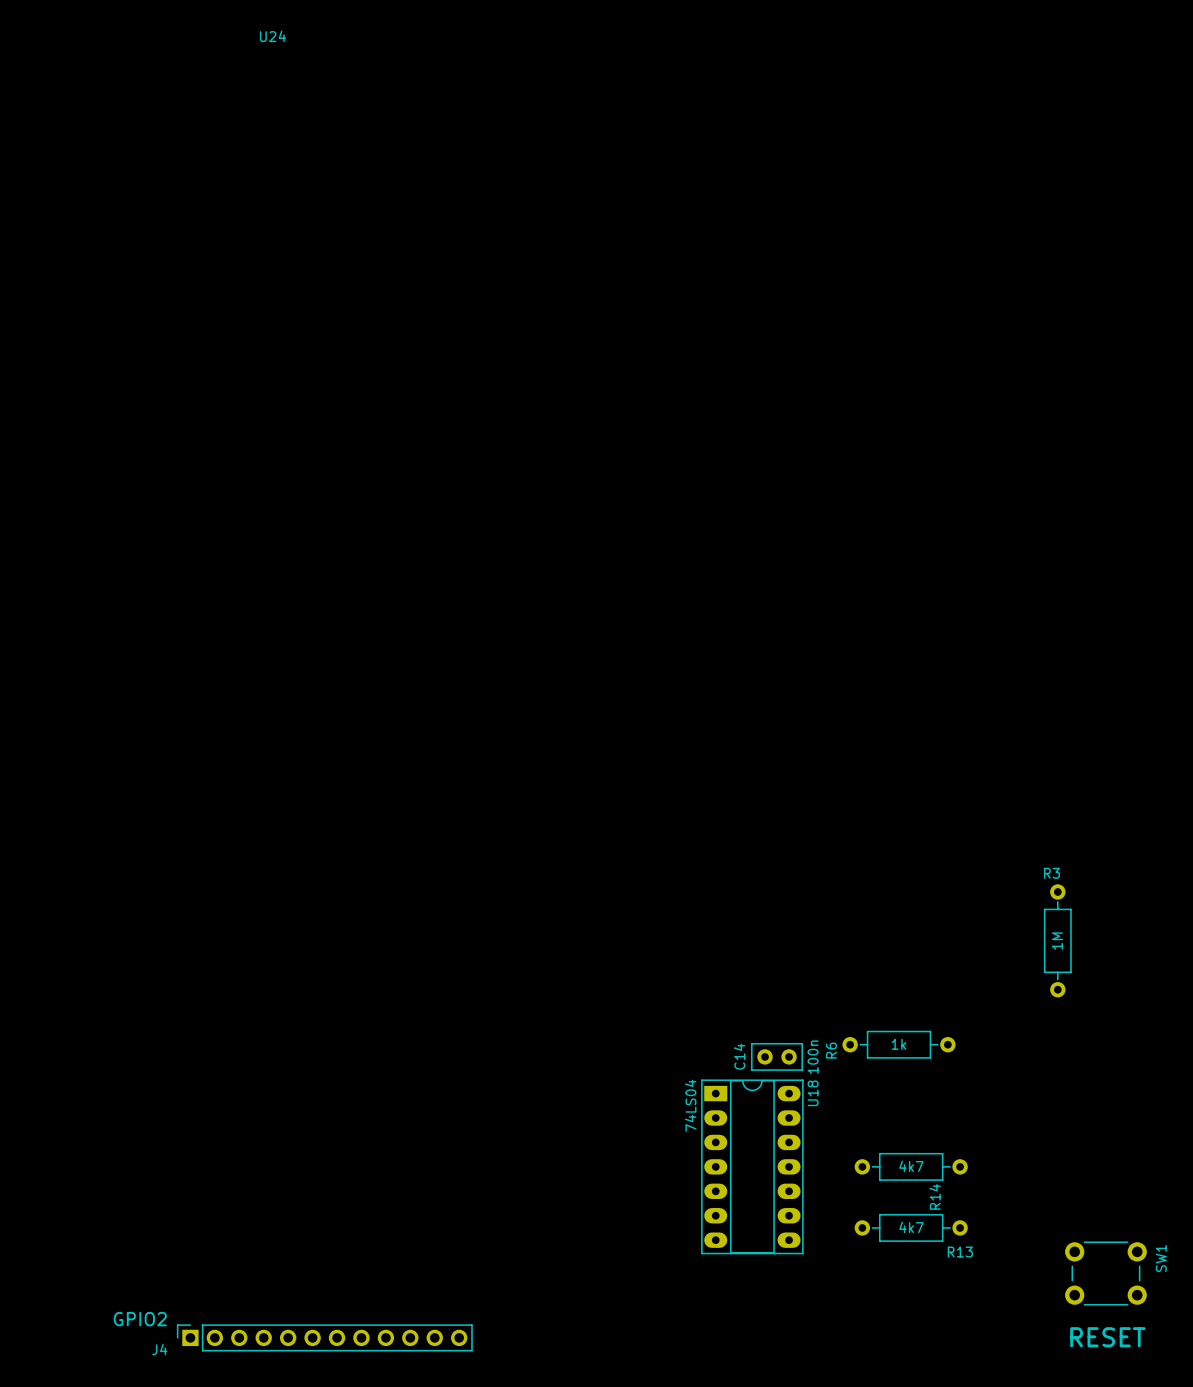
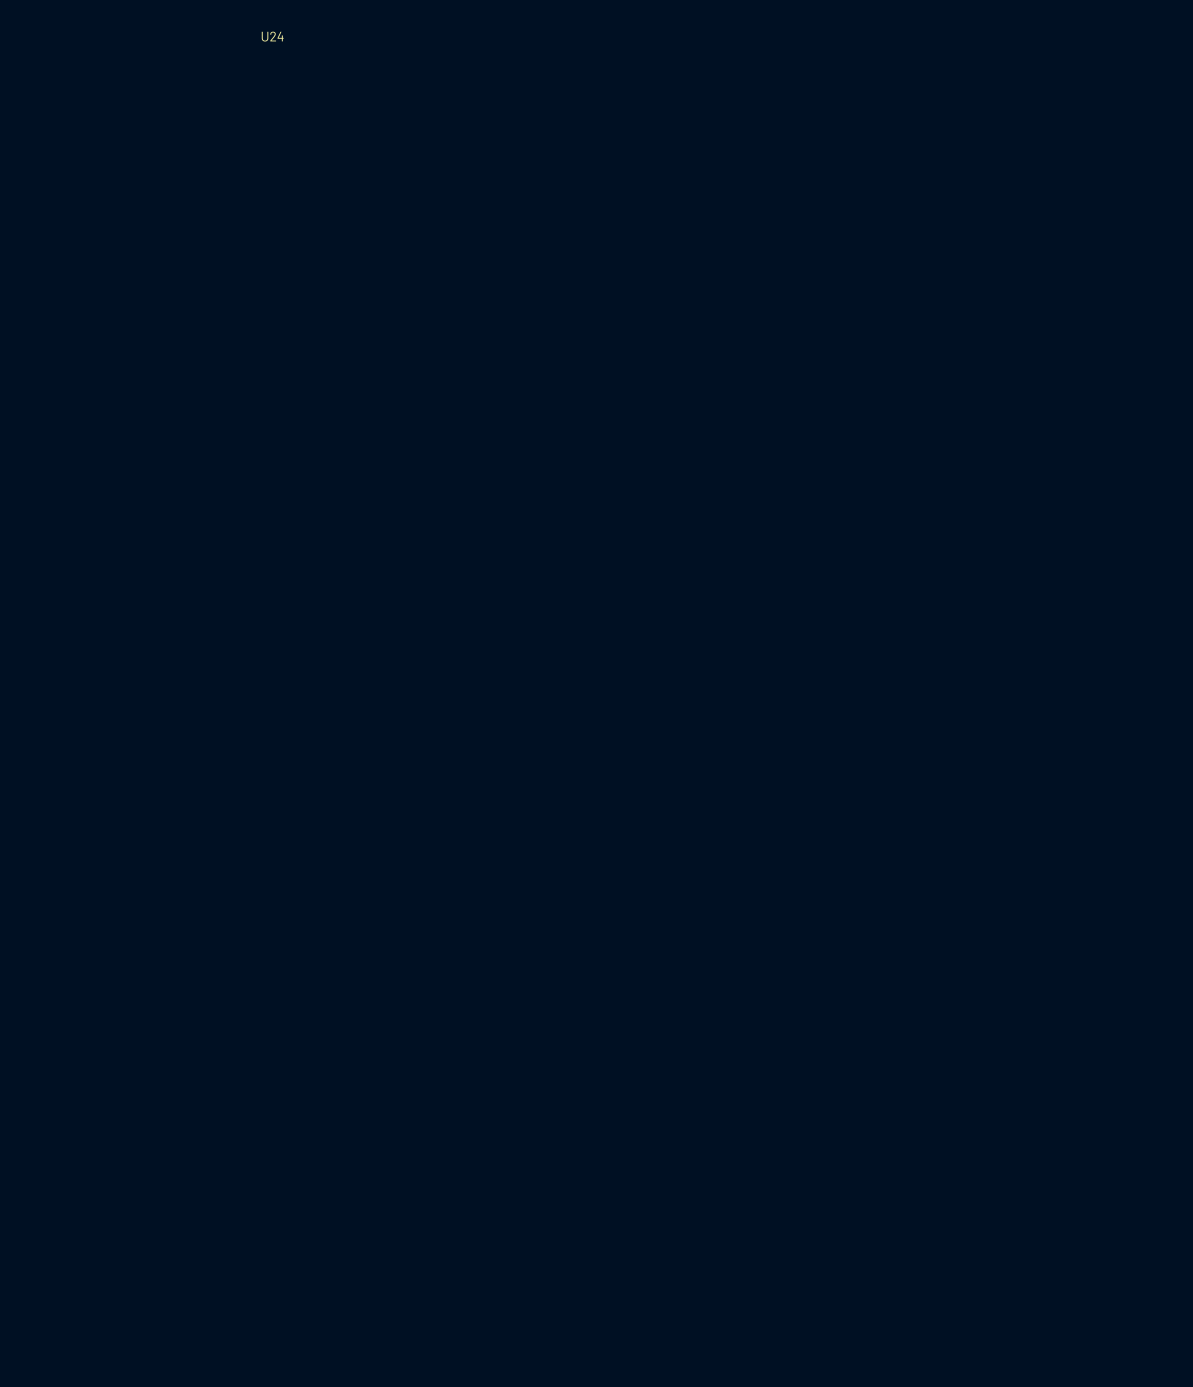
R3: 1M (1057, 940) -> none
R6: 1k (898, 1044) -> none
C14: 100n (777, 1056) -> none
U18: 74LS04 (752, 1166) -> none
R14: 4k7 (911, 1166) -> none
R13: 4k7 (911, 1227) -> none
SW1: RESET (1105, 1273) -> none
J4: GPIO2 (324, 1337) -> none

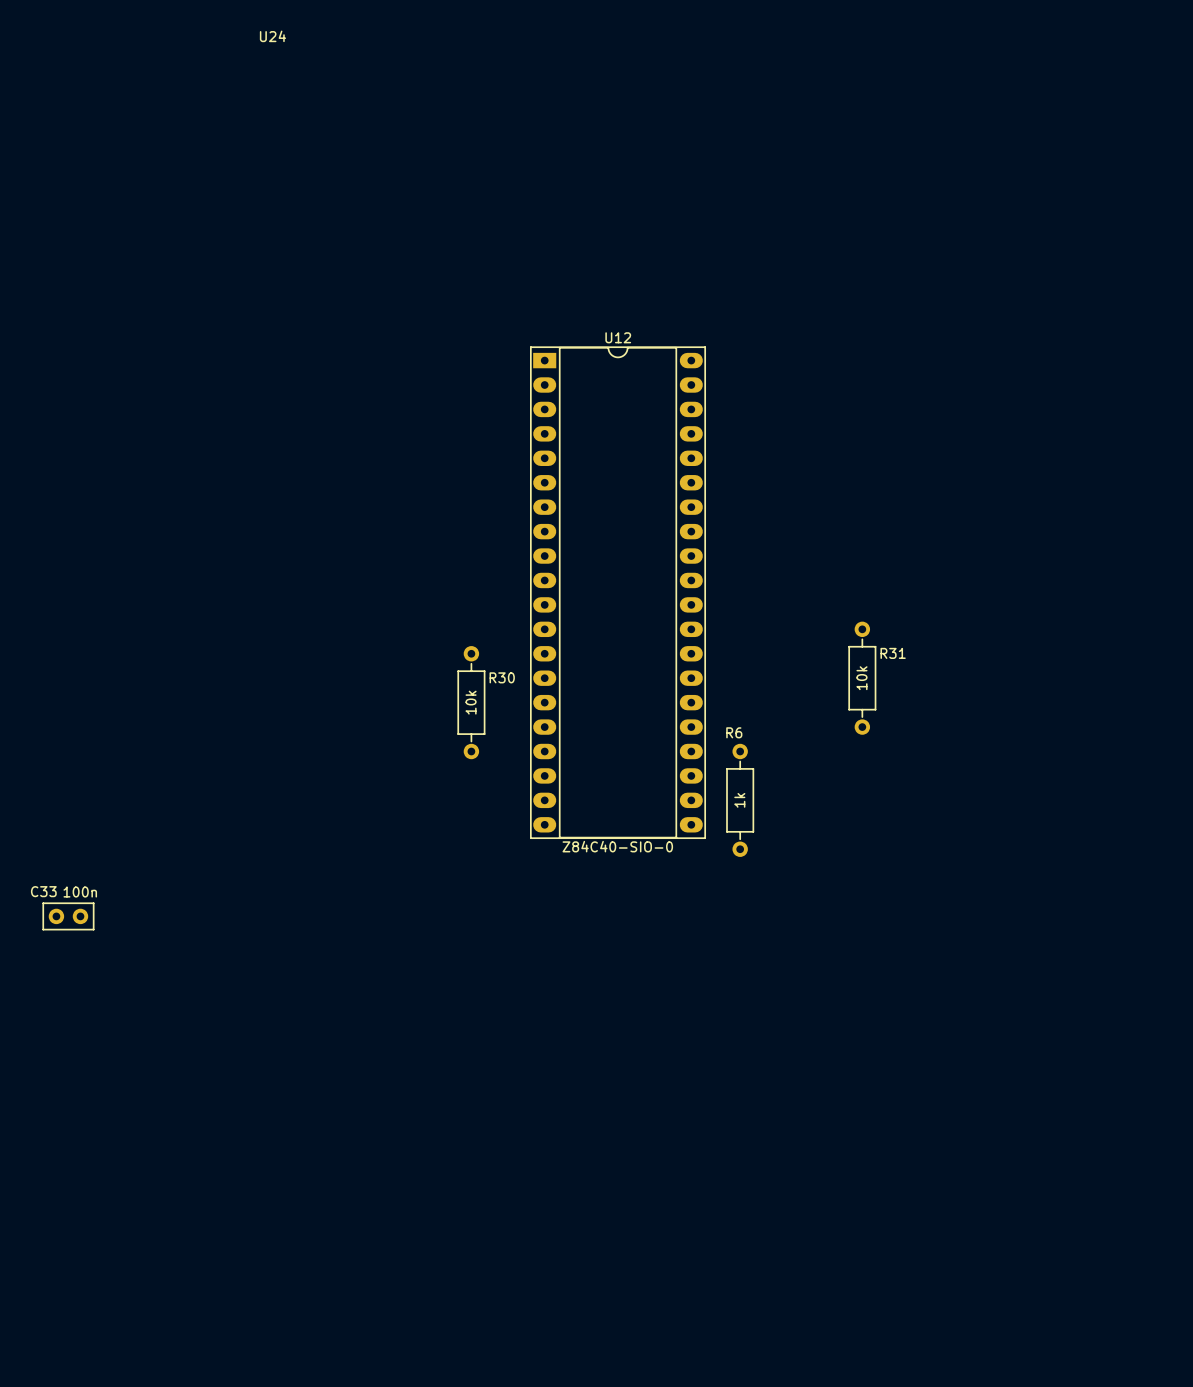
U12: none -> Z84C40-SIO-0 (618, 592)
R31: none -> 10k (862, 678)
R30: none -> 10k (471, 702)
R6: none -> 1k (740, 800)
C33: none -> 100n (68, 916)

